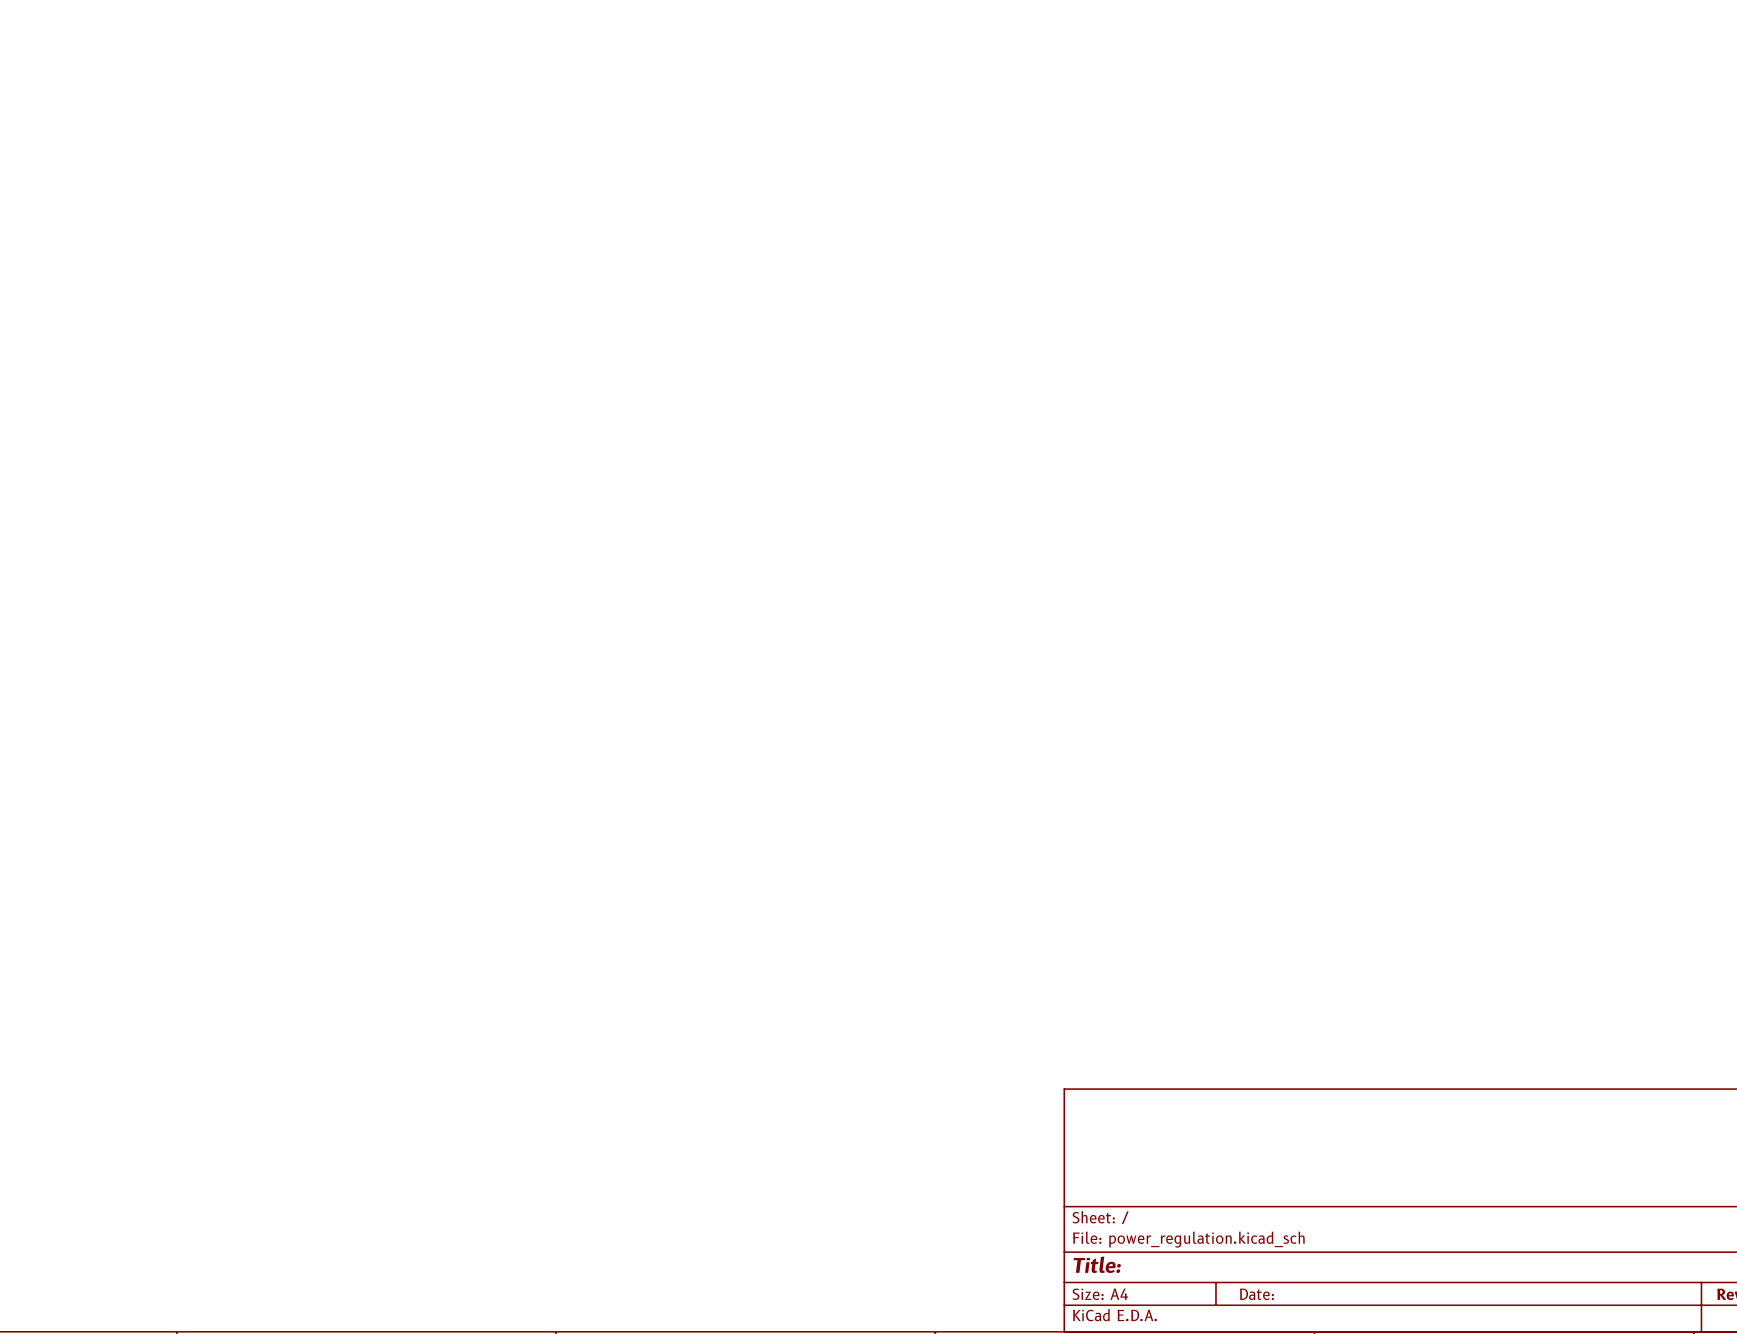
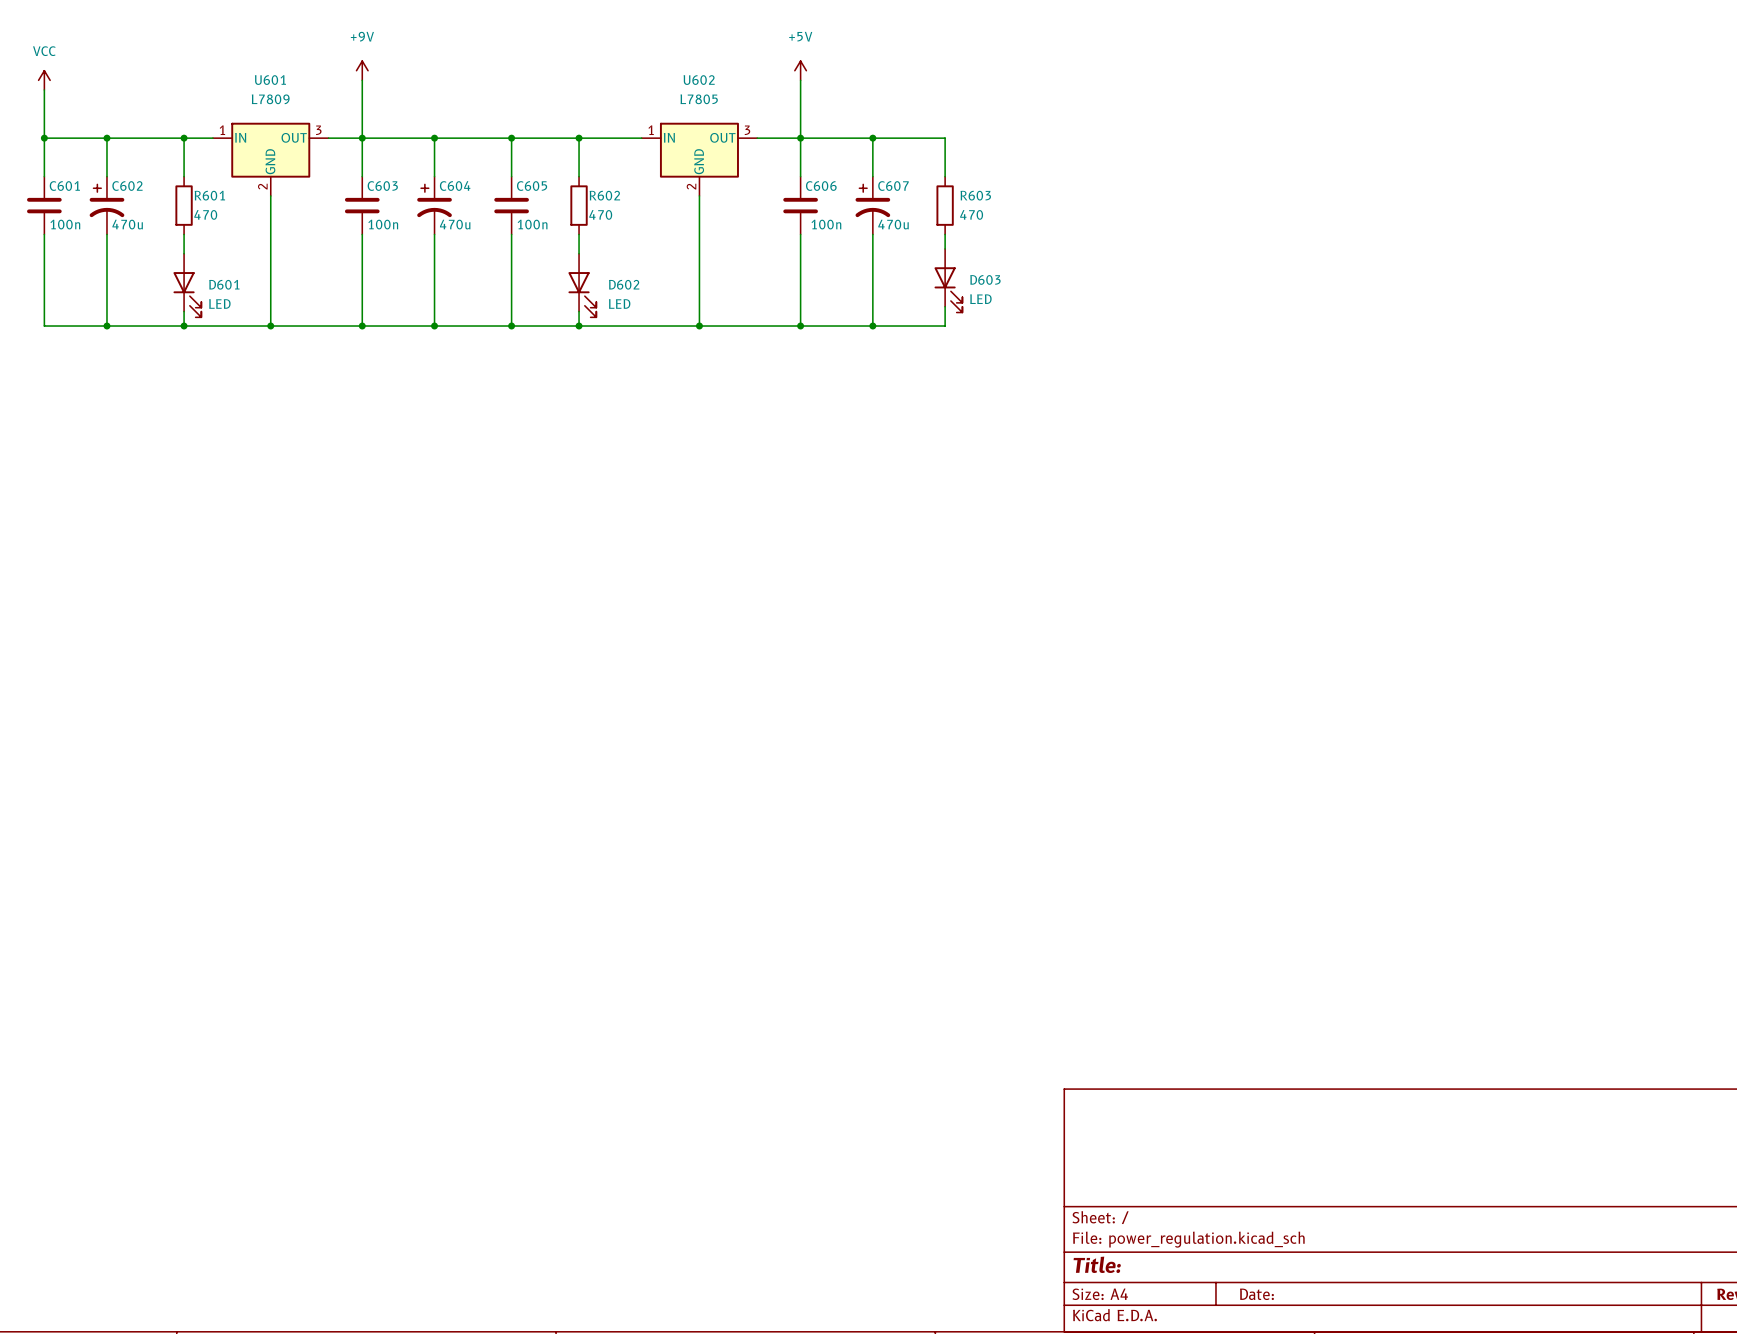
power symbol: none -> +9V (362, 70)
power symbol: none -> +5V (800, 70)
power symbol: none -> VCC (44, 80)
wire: none -> (362, 80) (362, 176)
wire: none -> (800, 80) (800, 176)
wire: none -> (44, 89) (44, 176)
wire: none -> (44, 138) (212, 138)
junction: none -> (44, 138)
wire: none -> (106, 138) (106, 176)
junction: none -> (106, 138)
wire: none -> (184, 138) (184, 176)
junction: none -> (184, 138)
wire: none -> (328, 138) (641, 138)
junction: none -> (362, 138)
wire: none -> (434, 138) (434, 176)
junction: none -> (434, 138)
wire: none -> (511, 138) (511, 176)
junction: none -> (511, 138)
wire: none -> (579, 138) (579, 176)
junction: none -> (579, 138)
wire: none -> (757, 138) (945, 138) (945, 176)
junction: none -> (800, 138)
wire: none -> (872, 138) (872, 176)
junction: none -> (872, 138)
U601: none -> L7809 (270, 159)
U602: none -> L7805 (699, 159)
wire: none -> (270, 195) (270, 326)
wire: none -> (699, 195) (699, 326)
C601: none -> 100n (44, 205)
C602: none -> 470u (106, 205)
R601: none -> 470 (184, 205)
C603: none -> 100n (362, 205)
C604: none -> 470u (434, 205)
C605: none -> 100n (511, 205)
R602: none -> 470 (579, 205)
C606: none -> 100n (800, 205)
C607: none -> 470u (872, 205)
R603: none -> 470 (945, 205)
wire: none -> (44, 234) (44, 326) (945, 326) (945, 306)
wire: none -> (106, 234) (106, 326)
wire: none -> (184, 234) (184, 253)
wire: none -> (362, 234) (362, 326)
wire: none -> (434, 234) (434, 326)
wire: none -> (511, 234) (511, 326)
wire: none -> (579, 234) (579, 253)
wire: none -> (800, 234) (800, 326)
wire: none -> (872, 234) (872, 326)
wire: none -> (945, 234) (945, 248)
D603: none -> LED (948, 280)
D601: none -> LED (187, 285)
D602: none -> LED (582, 285)
wire: none -> (184, 311) (184, 326)
wire: none -> (579, 311) (579, 326)
junction: none -> (106, 326)
junction: none -> (184, 326)
junction: none -> (270, 326)
junction: none -> (362, 326)
junction: none -> (434, 326)
junction: none -> (511, 326)
junction: none -> (579, 326)
junction: none -> (699, 326)
junction: none -> (800, 326)
junction: none -> (872, 326)

